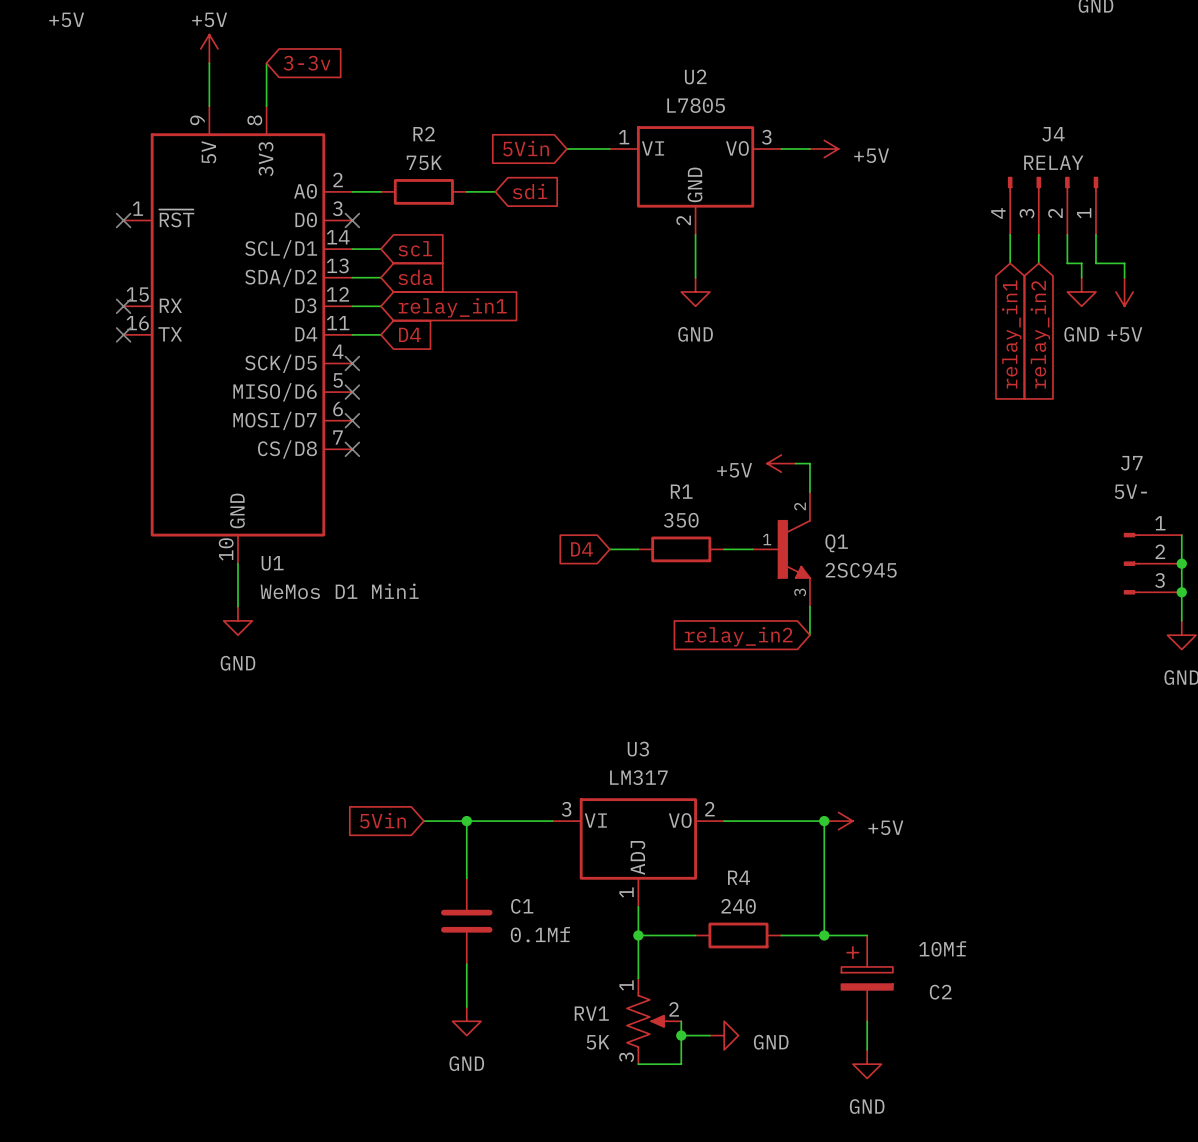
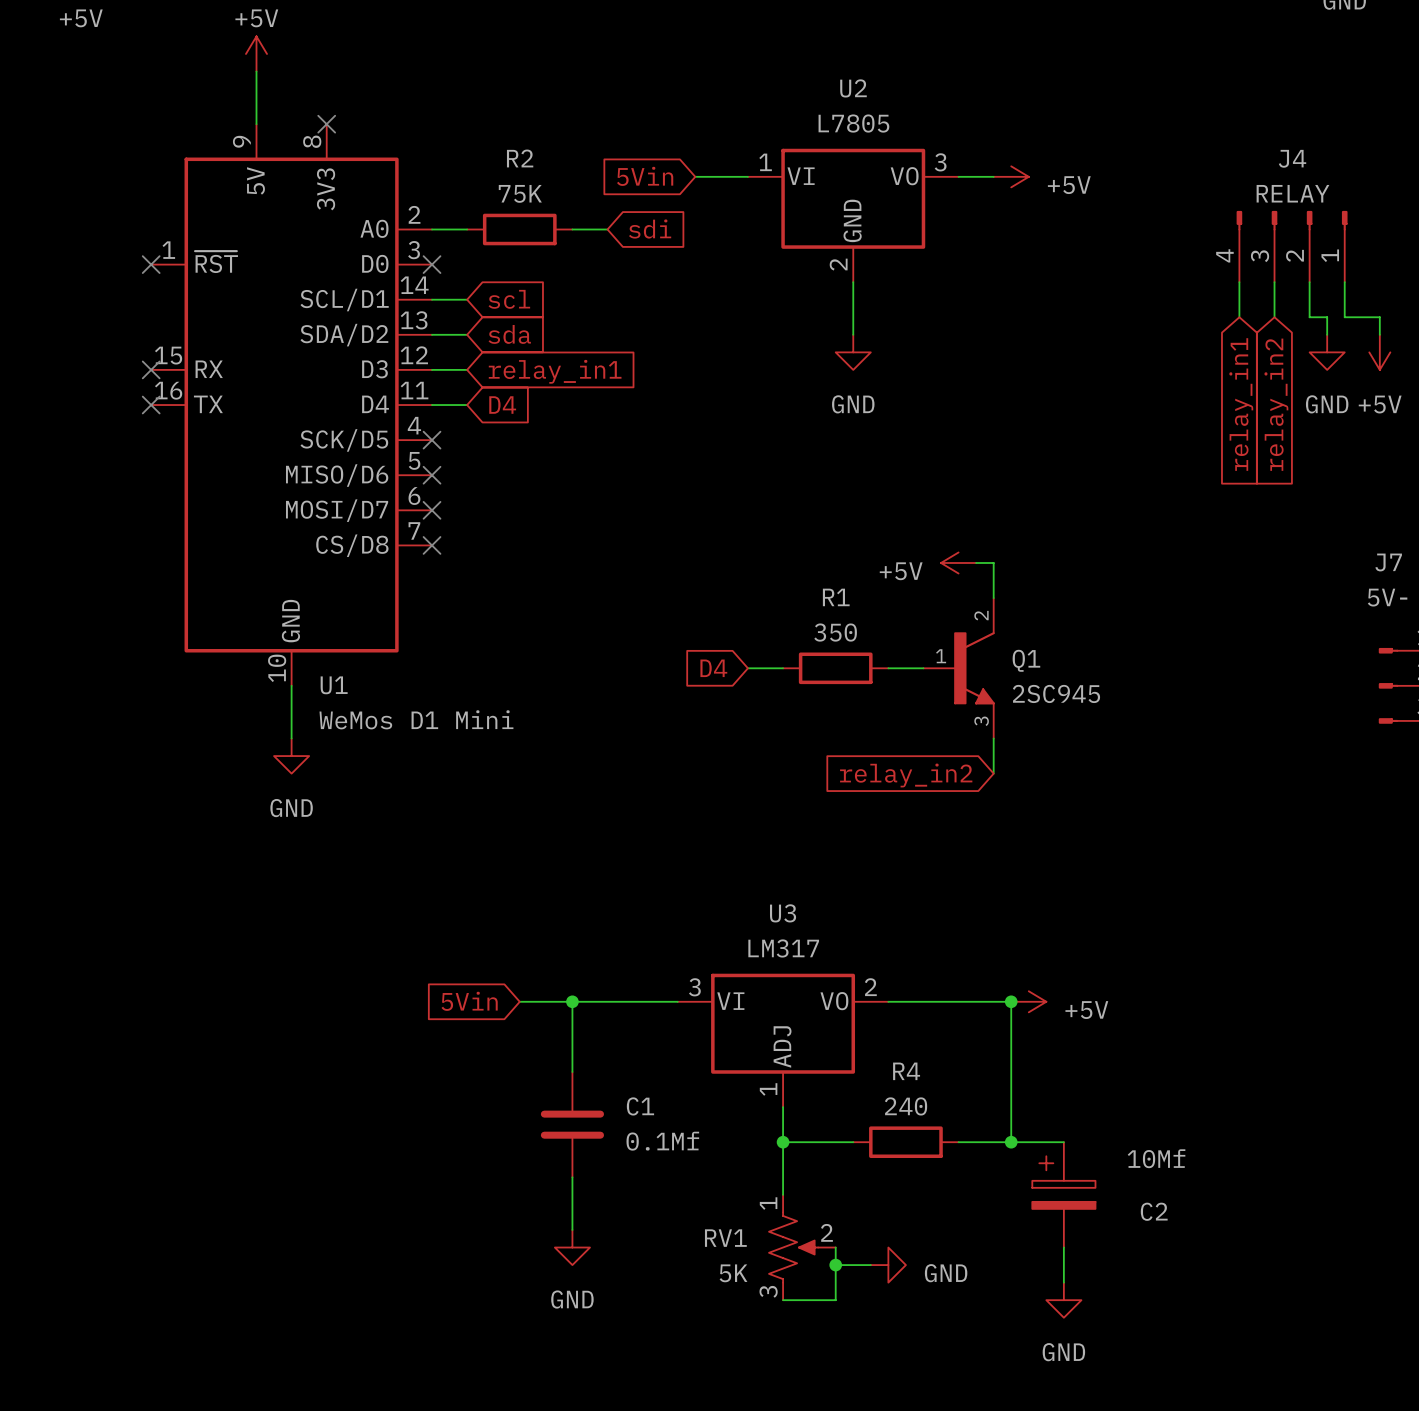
wire: (266, 63) (266, 106) -> none
global label: 3-3v (307, 63) -> none
no-connect mark: none -> (326, 124)

